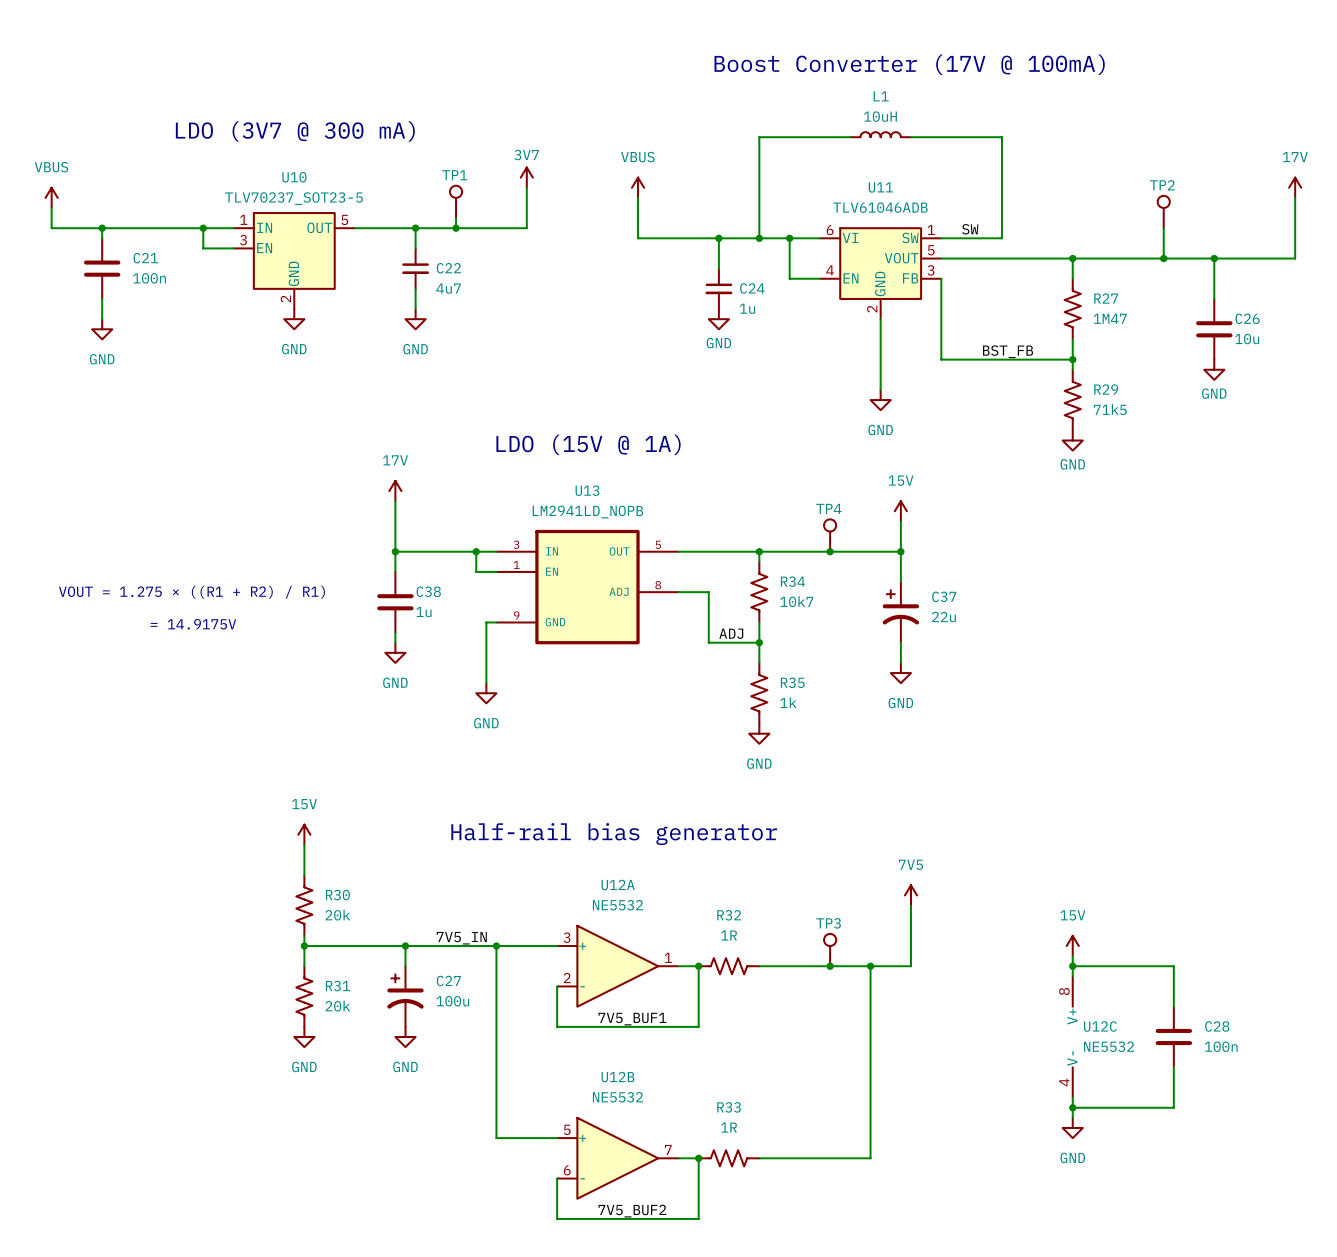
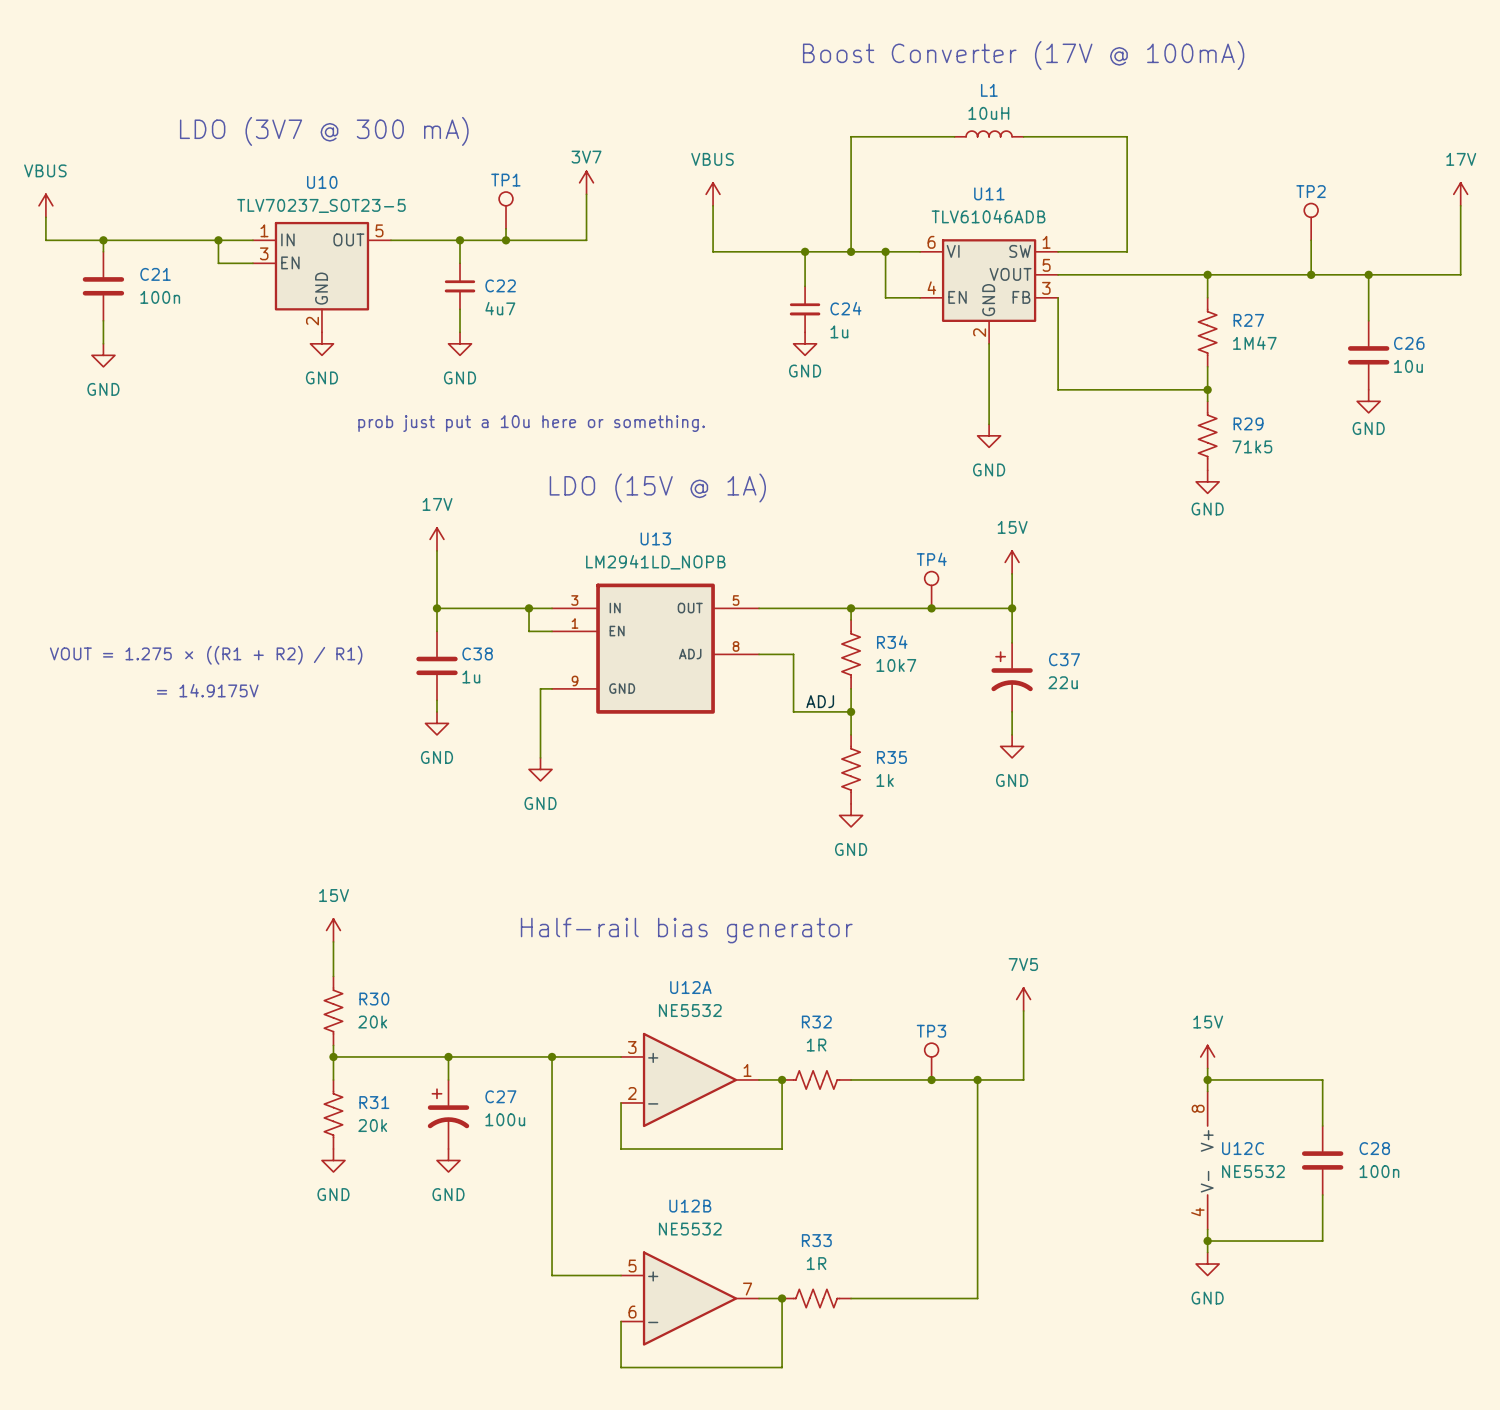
label: SW (970, 229) -> none
label: BST_FB (1008, 351) -> none
text: none -> prob just put a 10u here or something. (531, 423)
label: 7V5_IN (461, 938) -> none
label: 7V5_BUF1 (632, 1019) -> none
label: 7V5_BUF2 (632, 1211) -> none

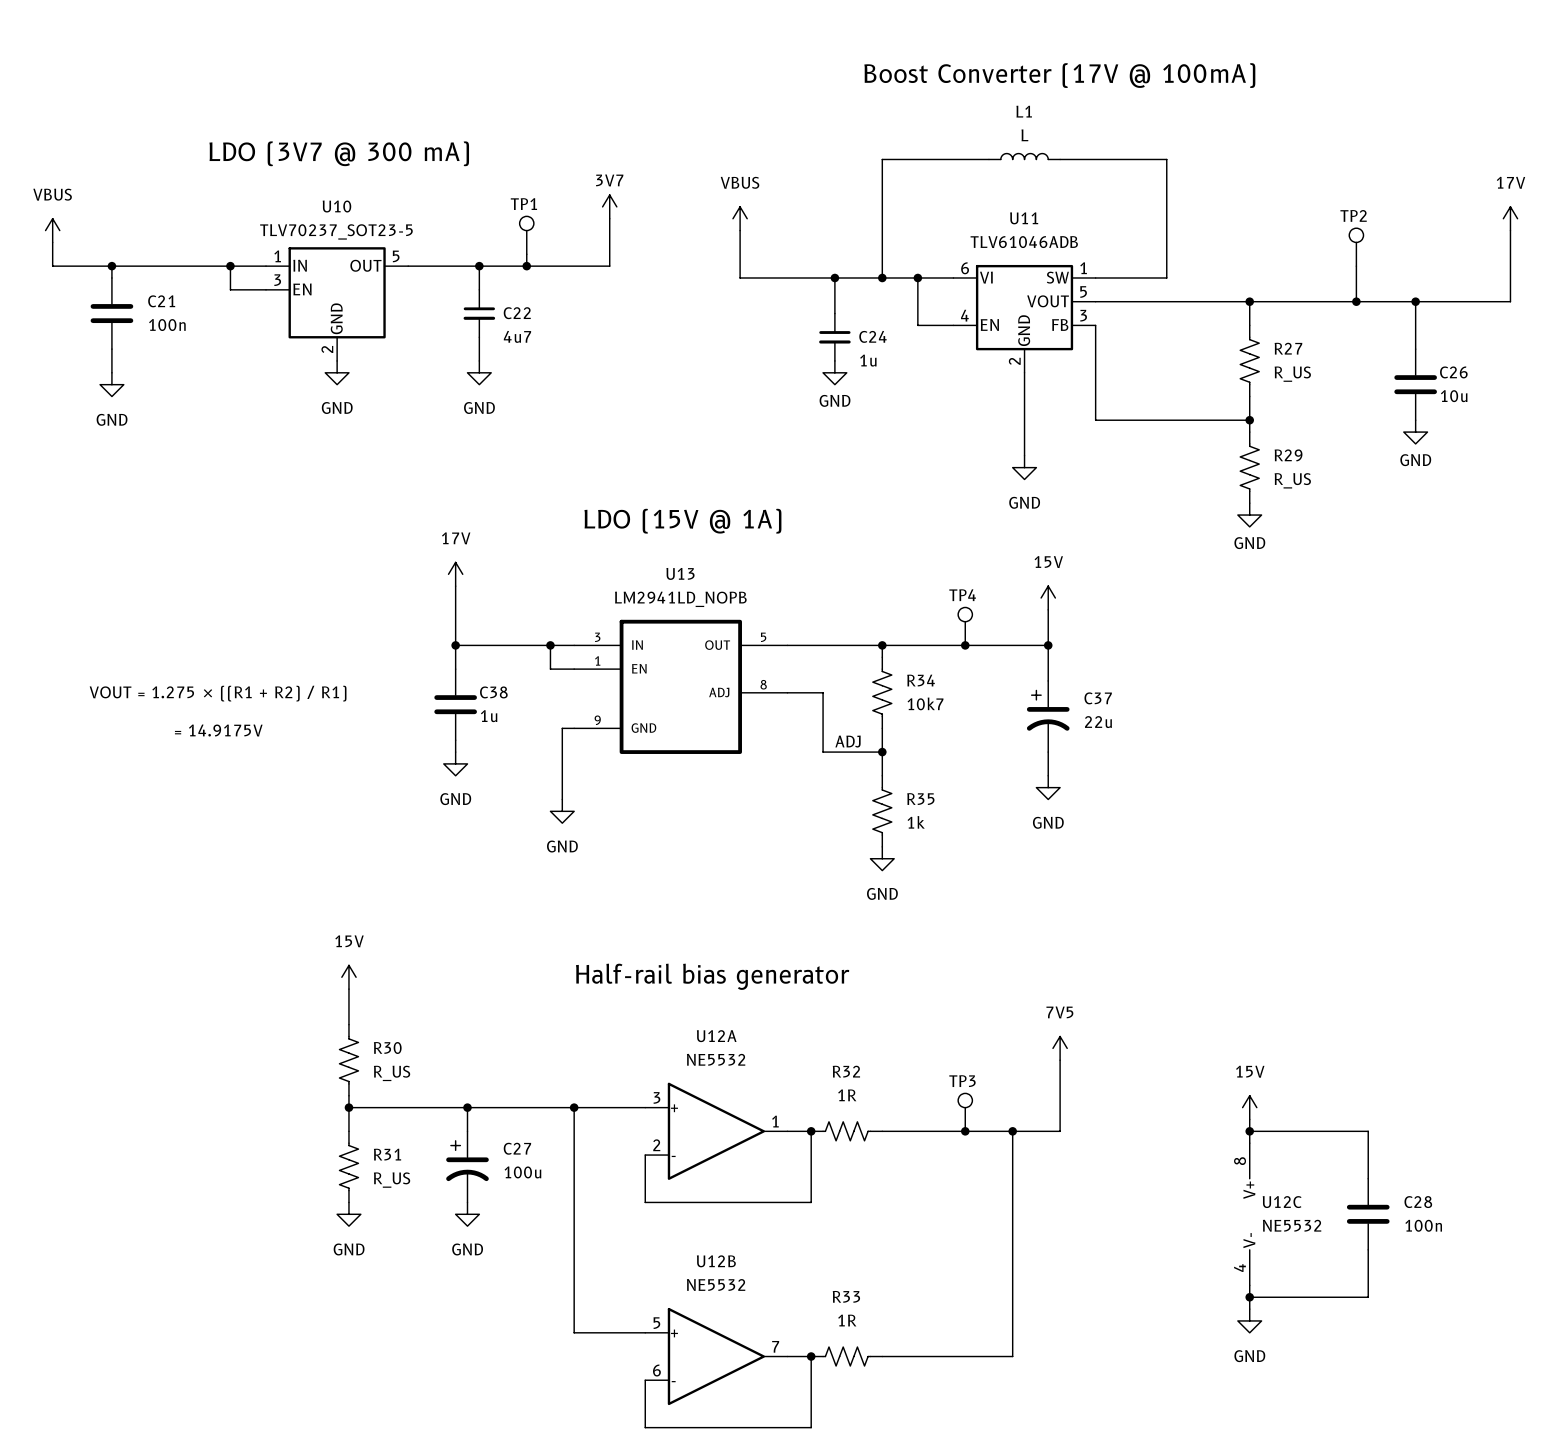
L1 value: 10uH (988, 113) -> L (1024, 135)
R27 value: 1M47 (1254, 343) -> R_US (1292, 374)
text: prob just put a 10u here or something. (531, 423) -> none
R29 value: 71k5 (1252, 446) -> R_US (1292, 480)
R30 value: 20k (372, 1022) -> R_US (392, 1073)
R31 value: 20k (372, 1125) -> R_US (392, 1180)

